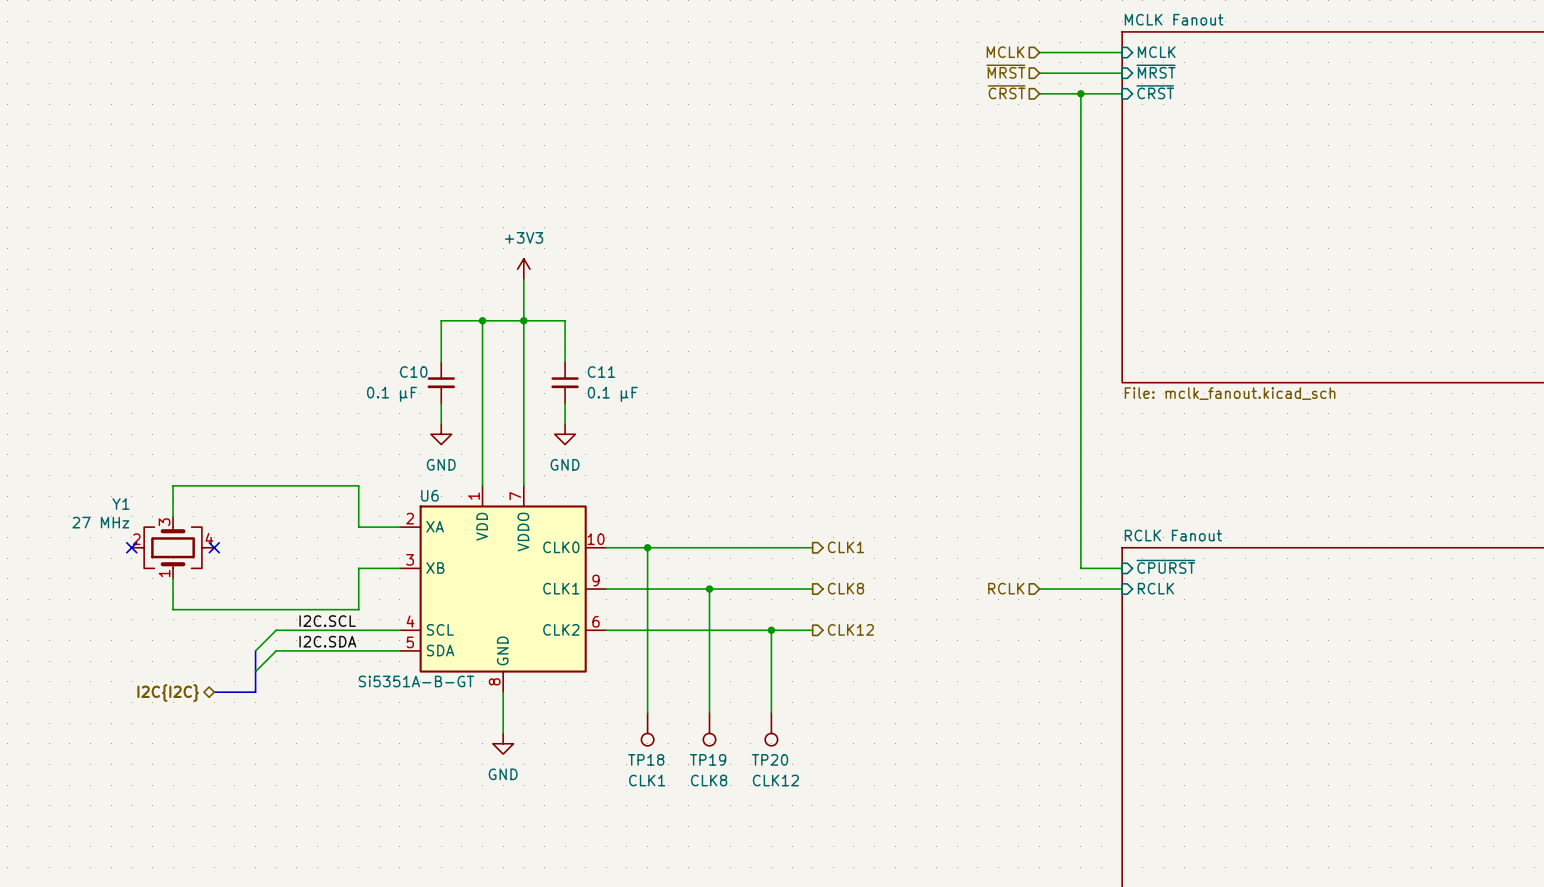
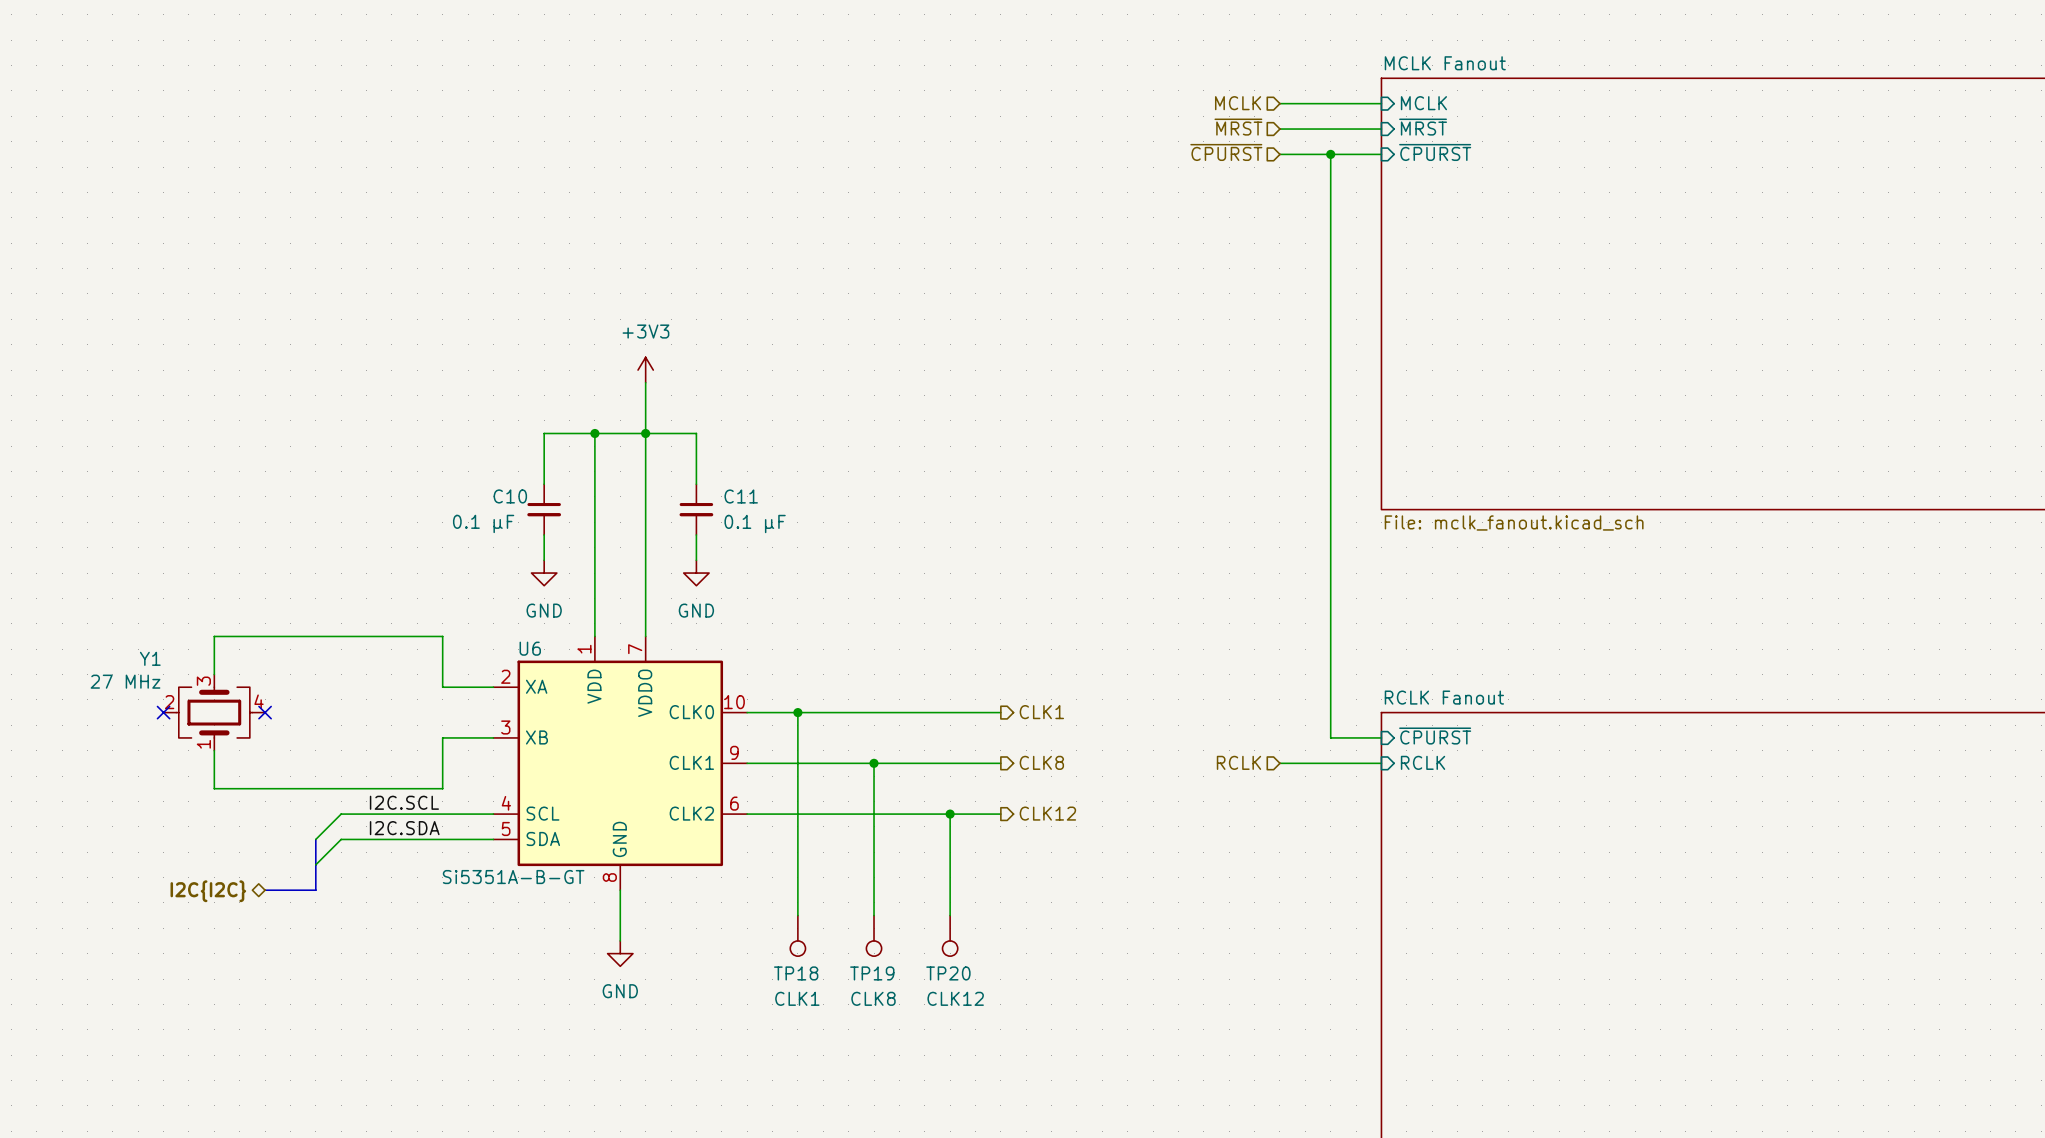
hierarchical label: ~{CRST} (1006, 92) -> ~{CPURST} (1226, 152)
sheet pin: ~{CRST} (1155, 92) -> ~{CPURST} (1435, 152)

